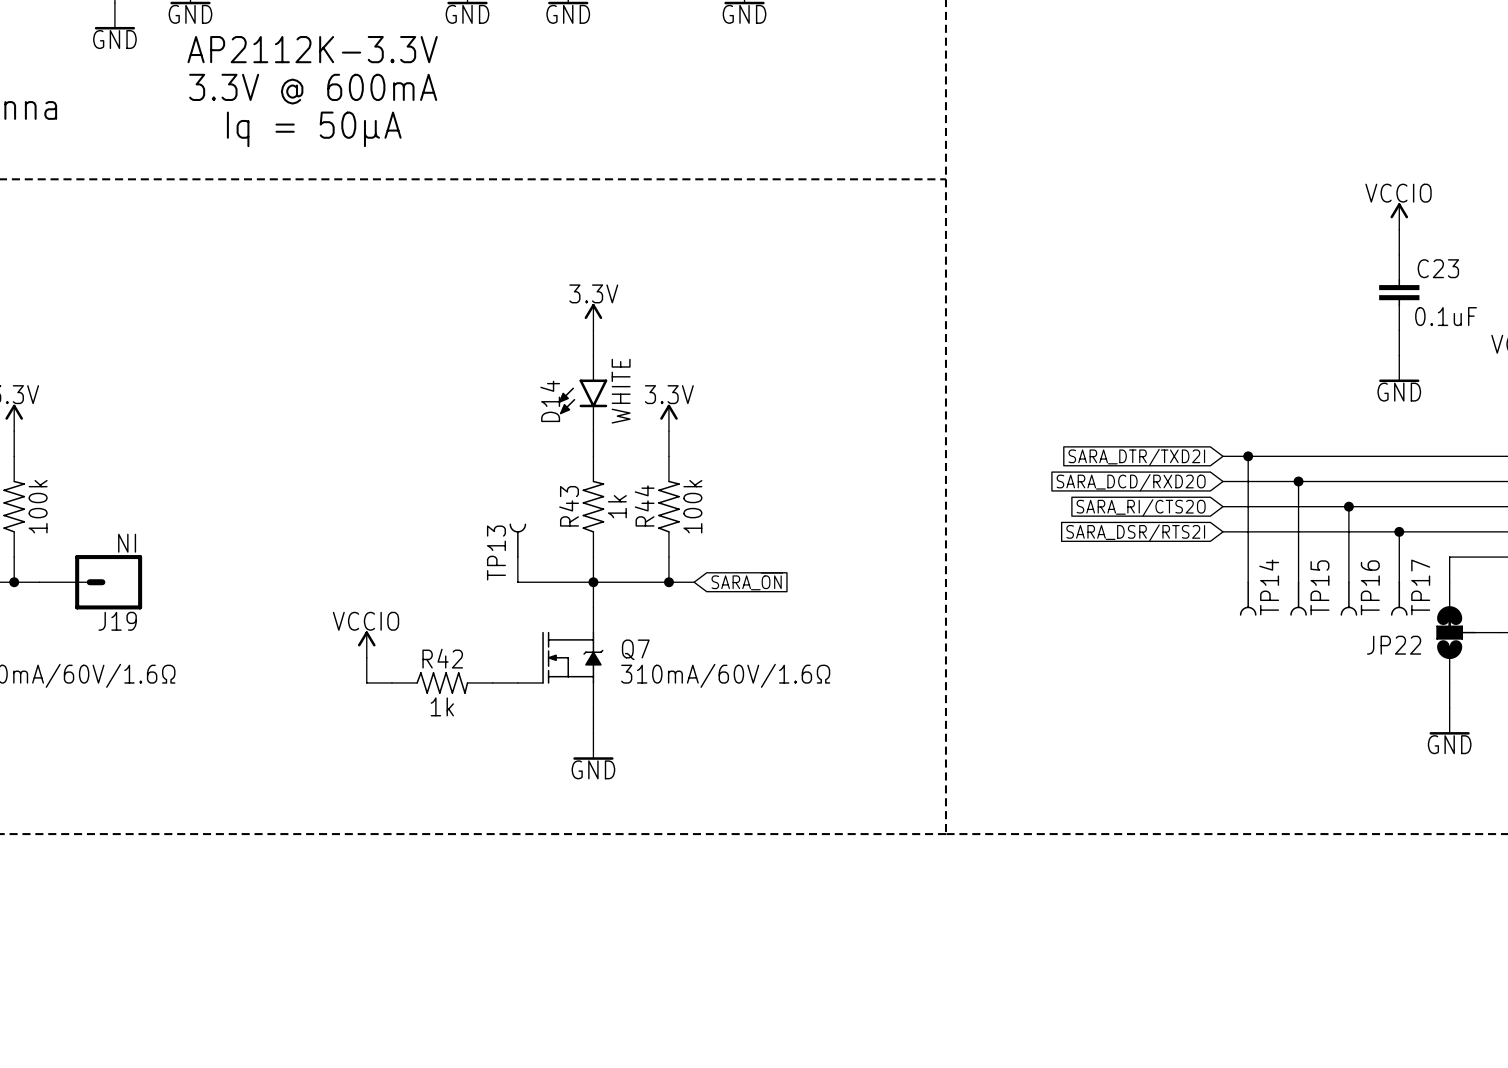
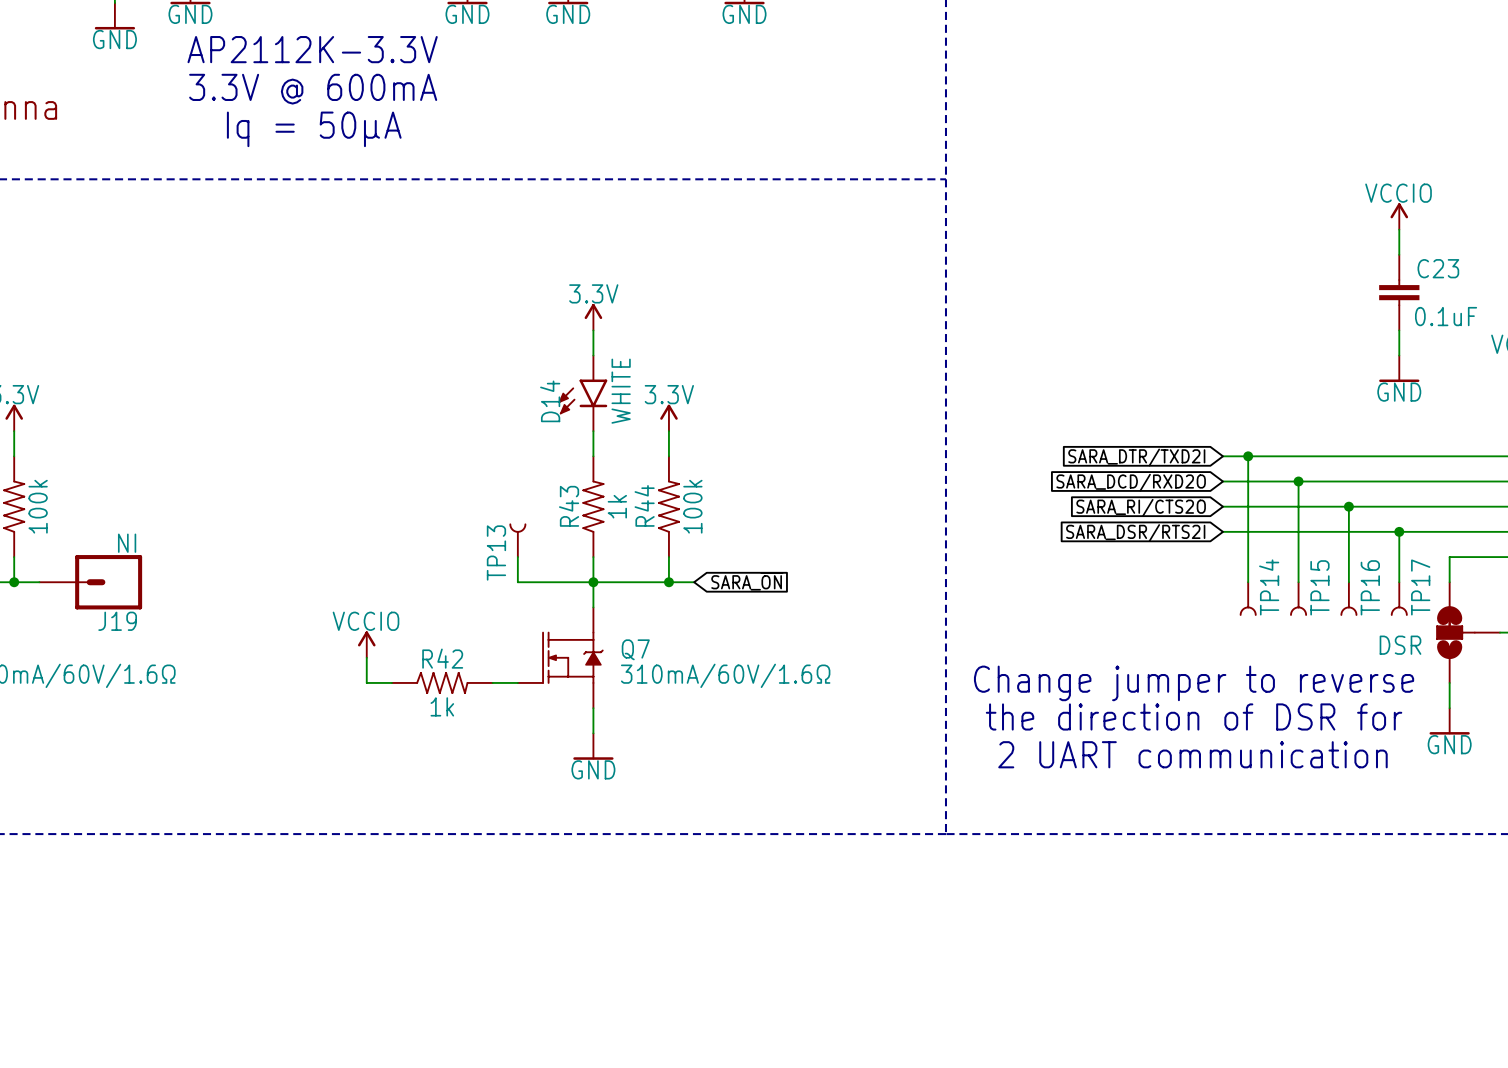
JP22 name: JP22 (1394, 645) -> DSR (1400, 645)
text: none -> Change jumper to reverse (1194, 683)
text: none -> the direction of DSR for (1194, 716)
text: none -> 2 UART communication (1192, 754)

